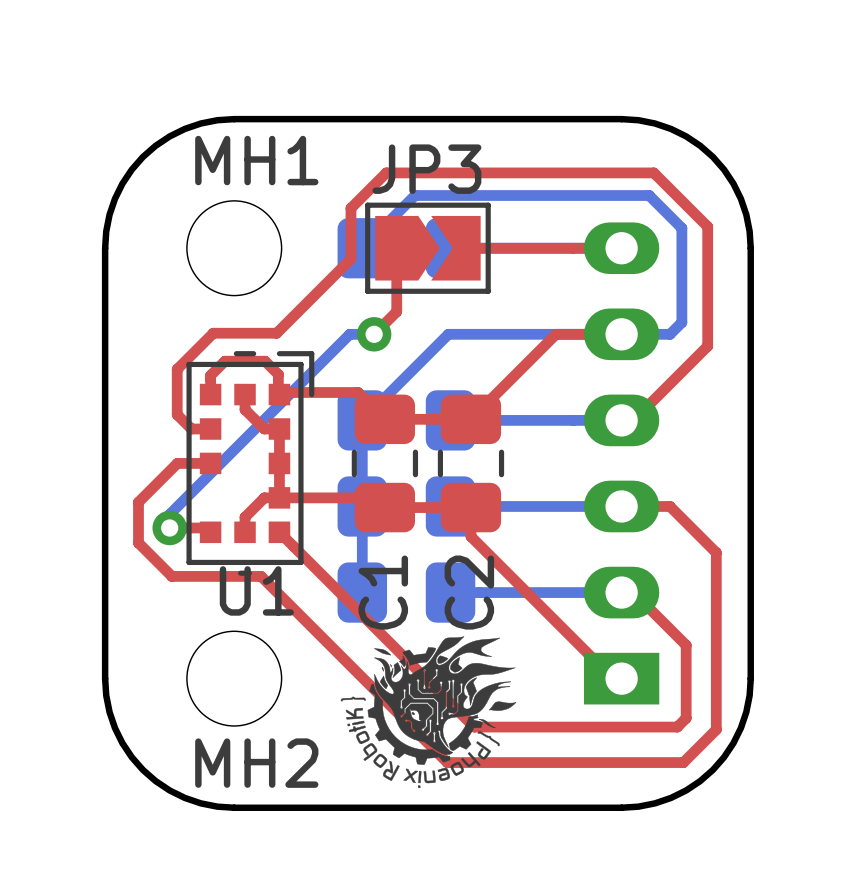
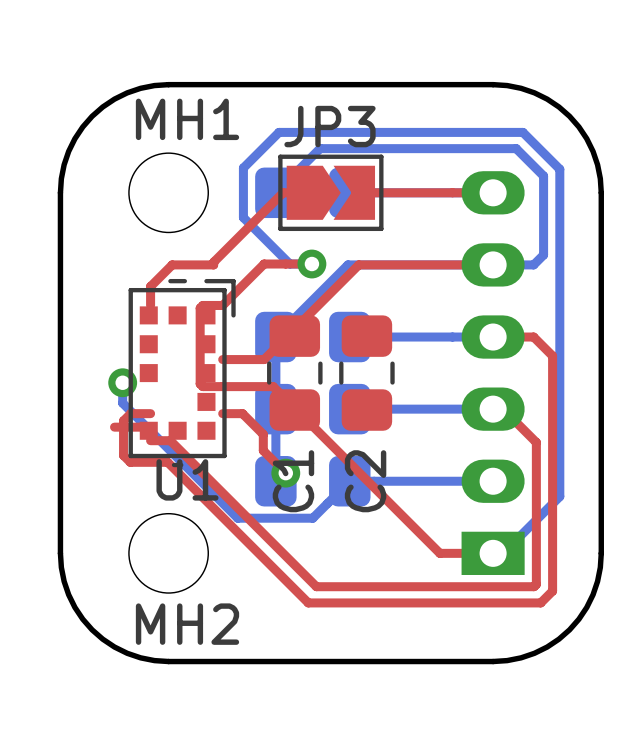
top track: (396, 248) (396, 311) (374, 334) -> (304, 192) (283, 192) (213, 262) (213, 264) (172, 264) (150, 286) (150, 305)
bottom track: none -> (311, 264) (289, 264) (243, 217) (243, 167) (279, 132) (522, 132) (559, 169) (559, 496) (503, 553) (493, 553)
bottom track: (374, 334) (349, 334) (169, 514) (169, 527) -> none
via position: (374, 334) -> (311, 264)
top track: (555, 334) (470, 419) (384, 419) (358, 392) (281, 392) (278, 394) (278, 374) (265, 361) (224, 361) (210, 375) (210, 394) -> (438, 264) (358, 264) (264, 359) (222, 359)
top track: (245, 394) (245, 409) (264, 429) (279, 429) (279, 497) -> none
top track: (633, 420) (707, 346) (707, 226) (653, 172) (386, 172) (350, 208) (350, 258) (276, 333) (213, 333) (177, 369) (177, 414) (191, 429) (210, 429) -> (503, 337) (533, 337) (552, 355) (552, 591) (540, 602) (308, 602) (167, 462) (130, 462) (123, 455) (123, 420) (130, 413) (150, 413)
top track: (210, 463) (177, 463) (138, 502) (138, 542) (171, 576) (261, 576) (447, 762) (683, 762) (716, 729) (716, 552) (670, 506) (633, 506) -> (150, 440) (170, 440) (316, 586) (534, 586) (536, 584) (536, 442) (503, 409)
bottom track: none -> (122, 382) (122, 403) (237, 518) (312, 518) (349, 481)
top track: none -> (222, 413) (242, 413) (263, 434) (263, 450) (285, 473)
via position: (169, 527) -> (122, 382)
top track: (245, 532) (245, 517) (264, 497) (375, 497) (384, 507) (470, 507) (470, 536) (613, 678) -> (311, 264) (264, 264) (222, 305) (202, 305) (200, 308) (200, 383) (202, 386) (273, 386) (439, 553) (485, 553)
top track: (279, 532) (474, 727) (677, 727) (686, 718) (686, 645) (633, 592) (621, 592) -> none
via: none -> (285, 473)
drawing: [340, 636, 517, 789] -> none

